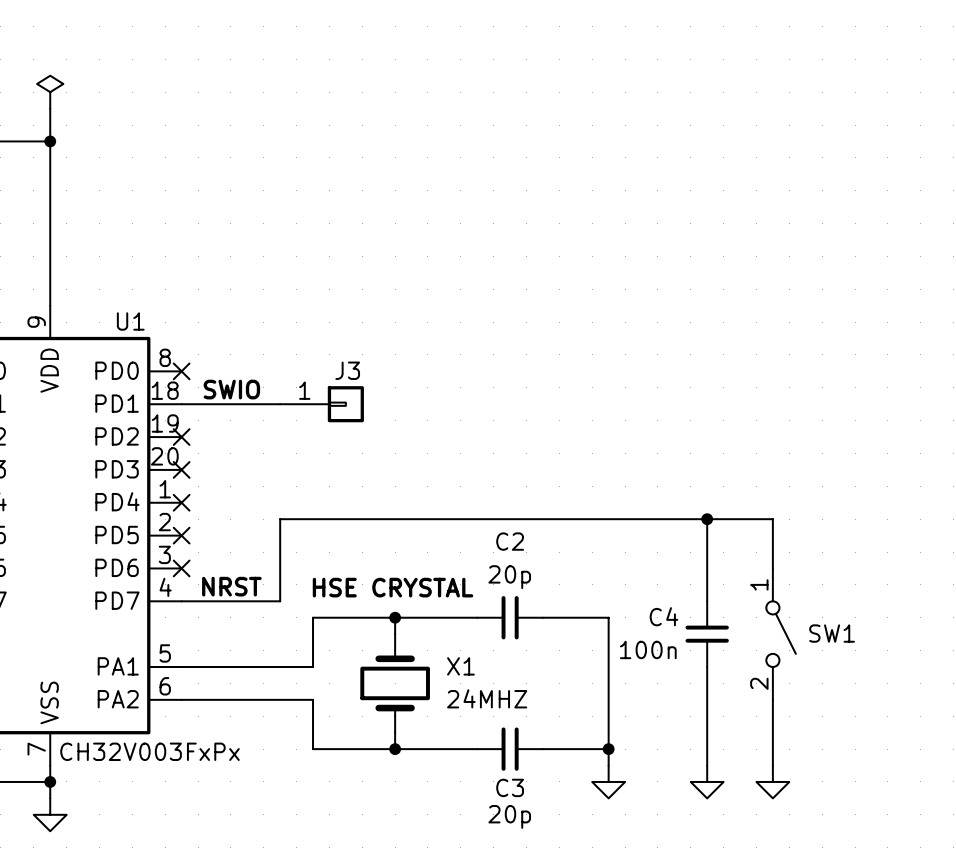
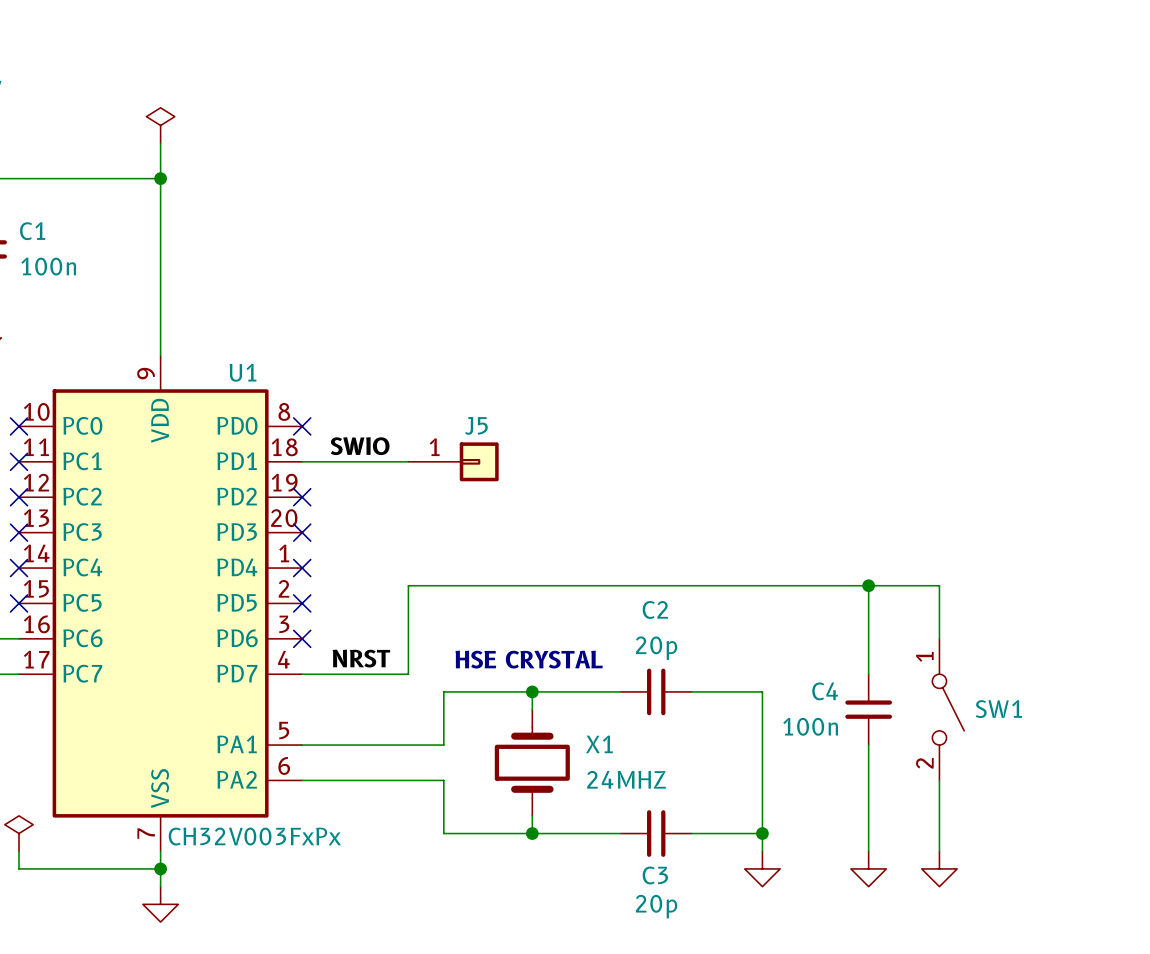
J3 name: J3 (347, 370) -> J5 (476, 425)

